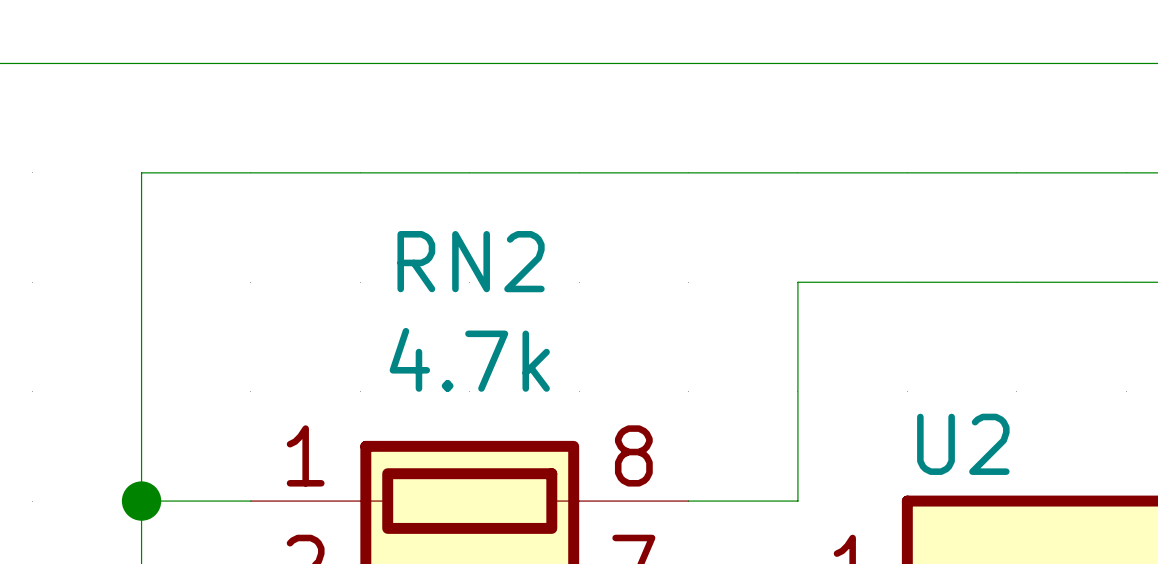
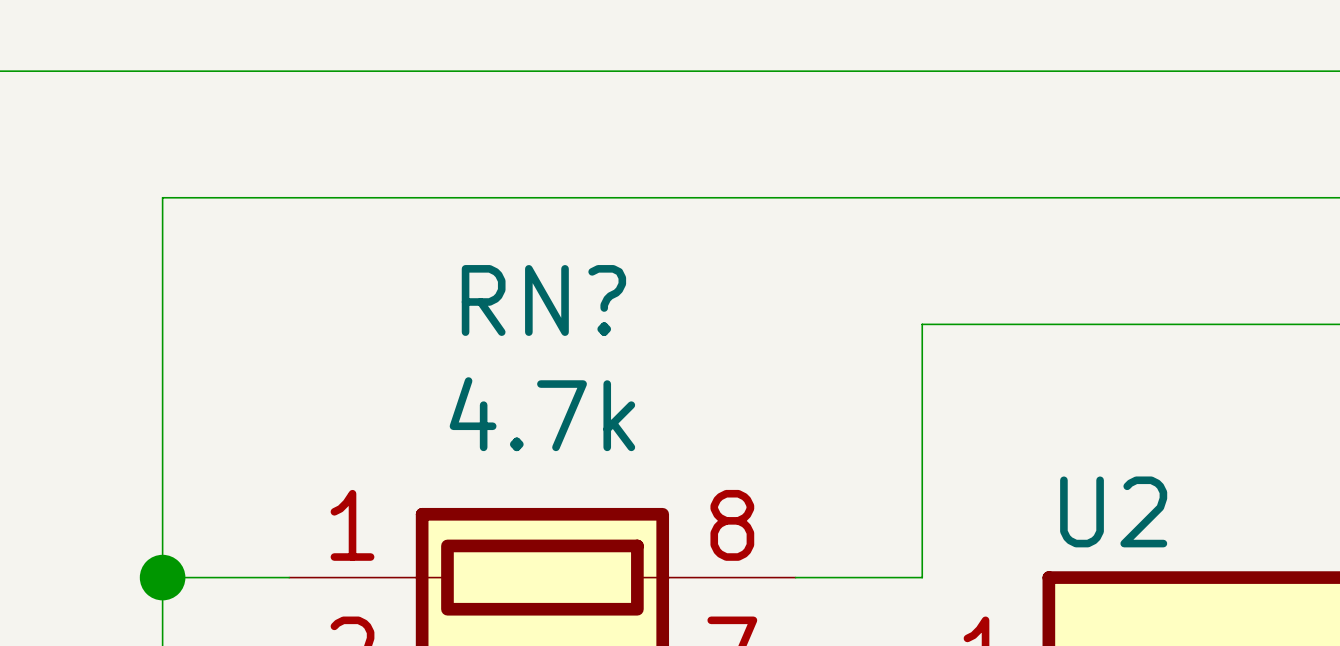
RN2 name: RN2 (471, 261) -> RN? (543, 300)

